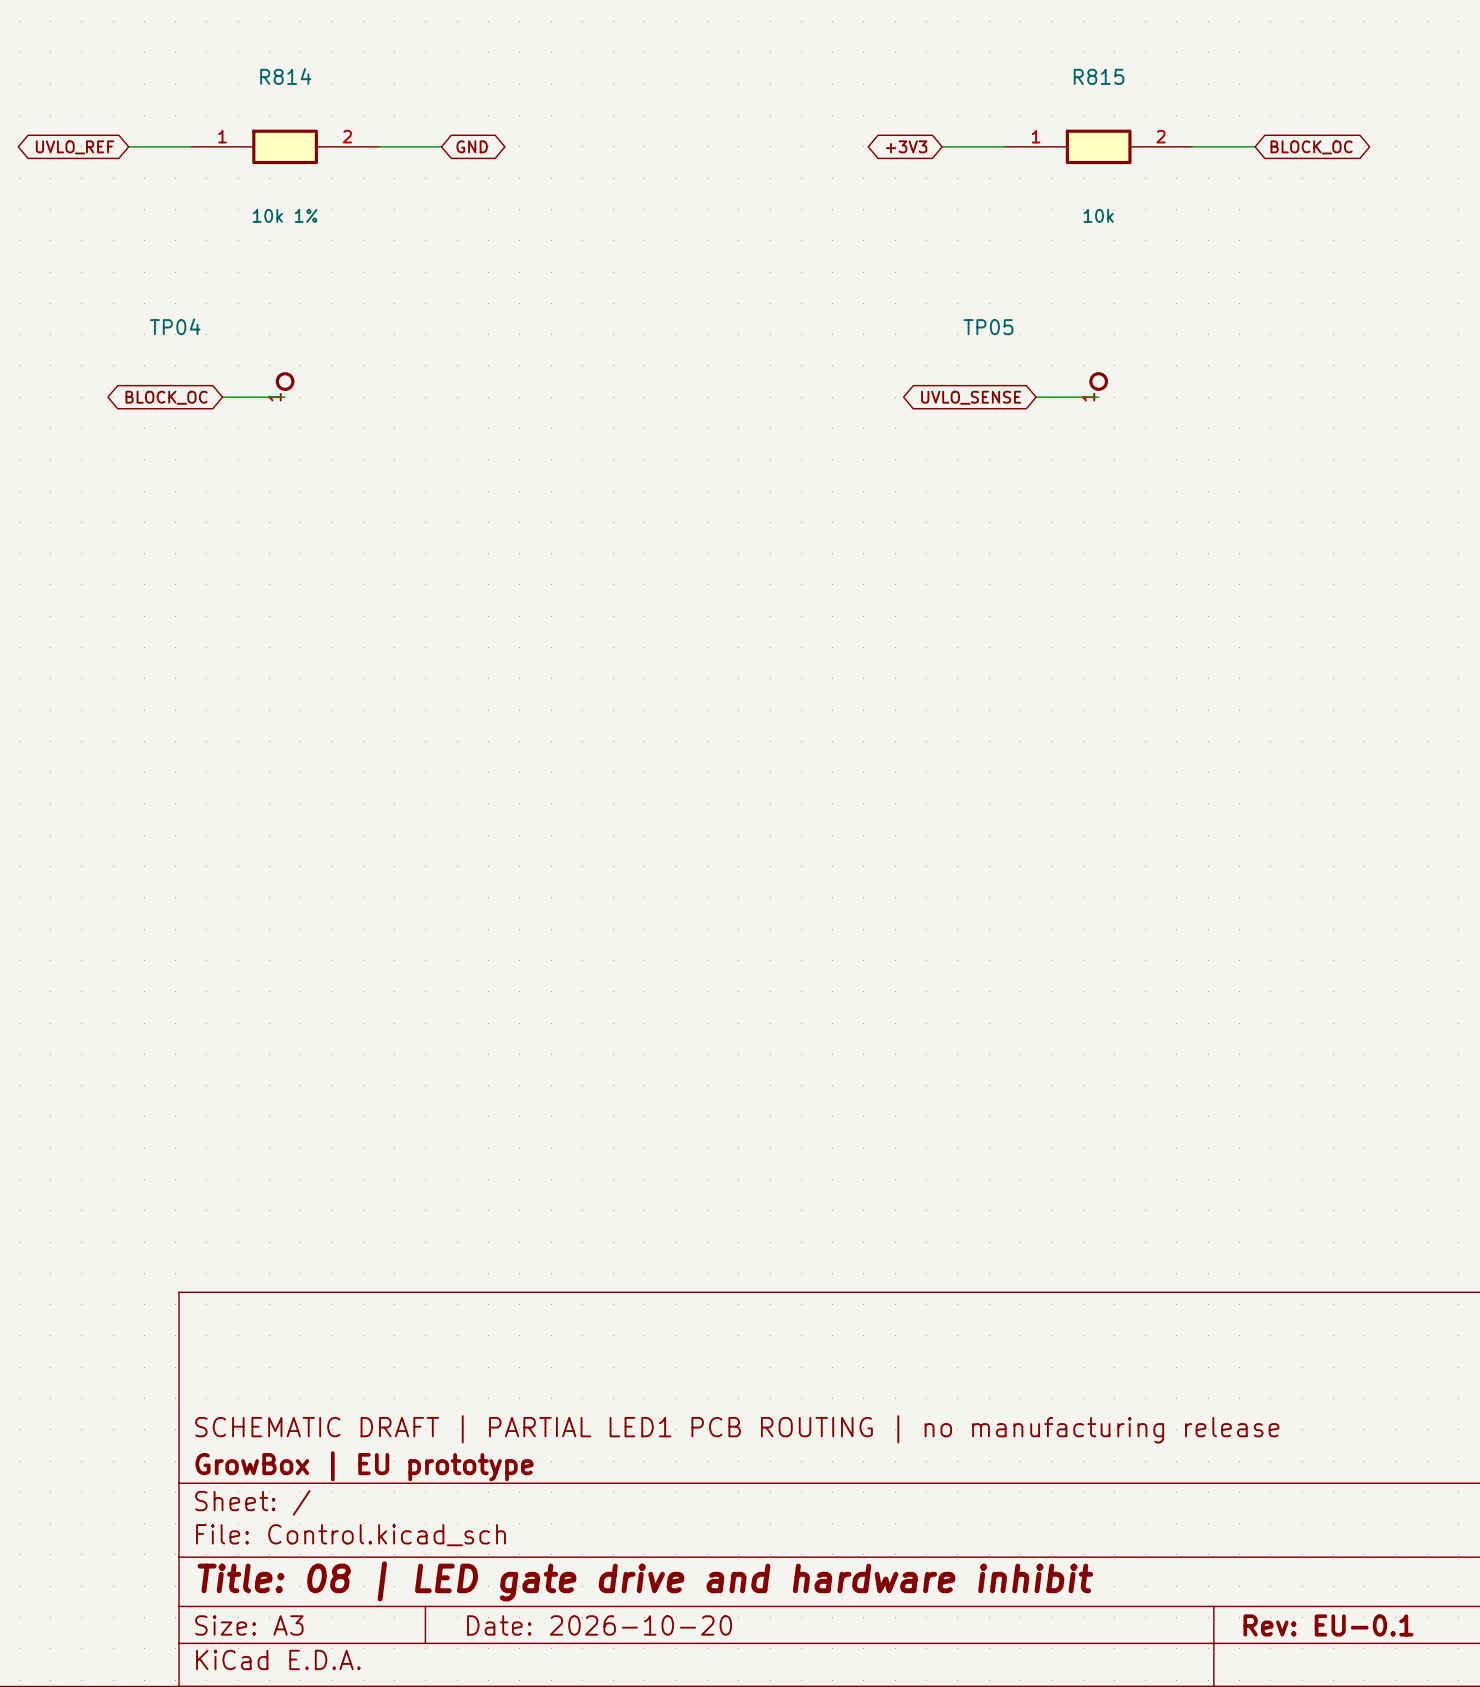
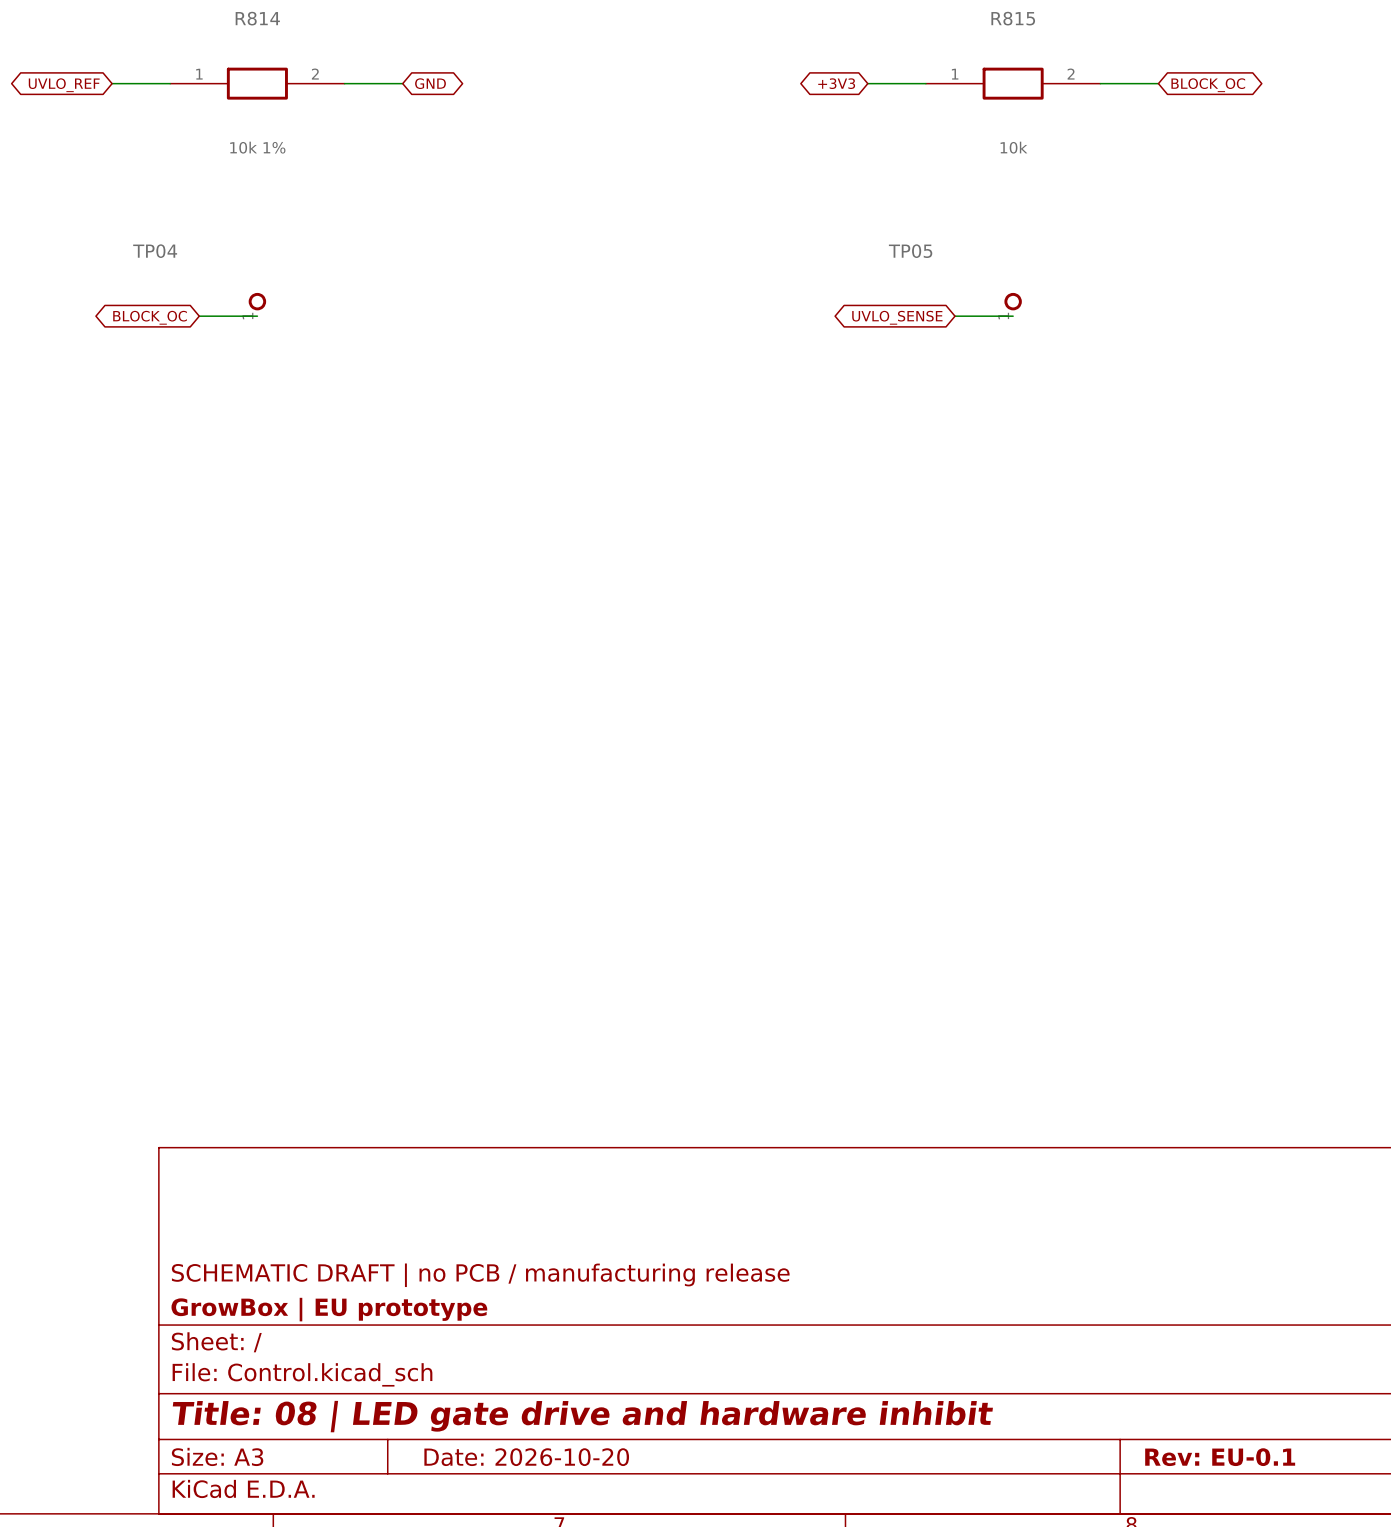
title block: SCHEMATIC DRAFT | PARTIAL LED1 PCB ROUTING | no manufacturing release (737, 1429) -> SCHEMATIC DRAFT | no PCB / manufacturing release (480, 1275)

